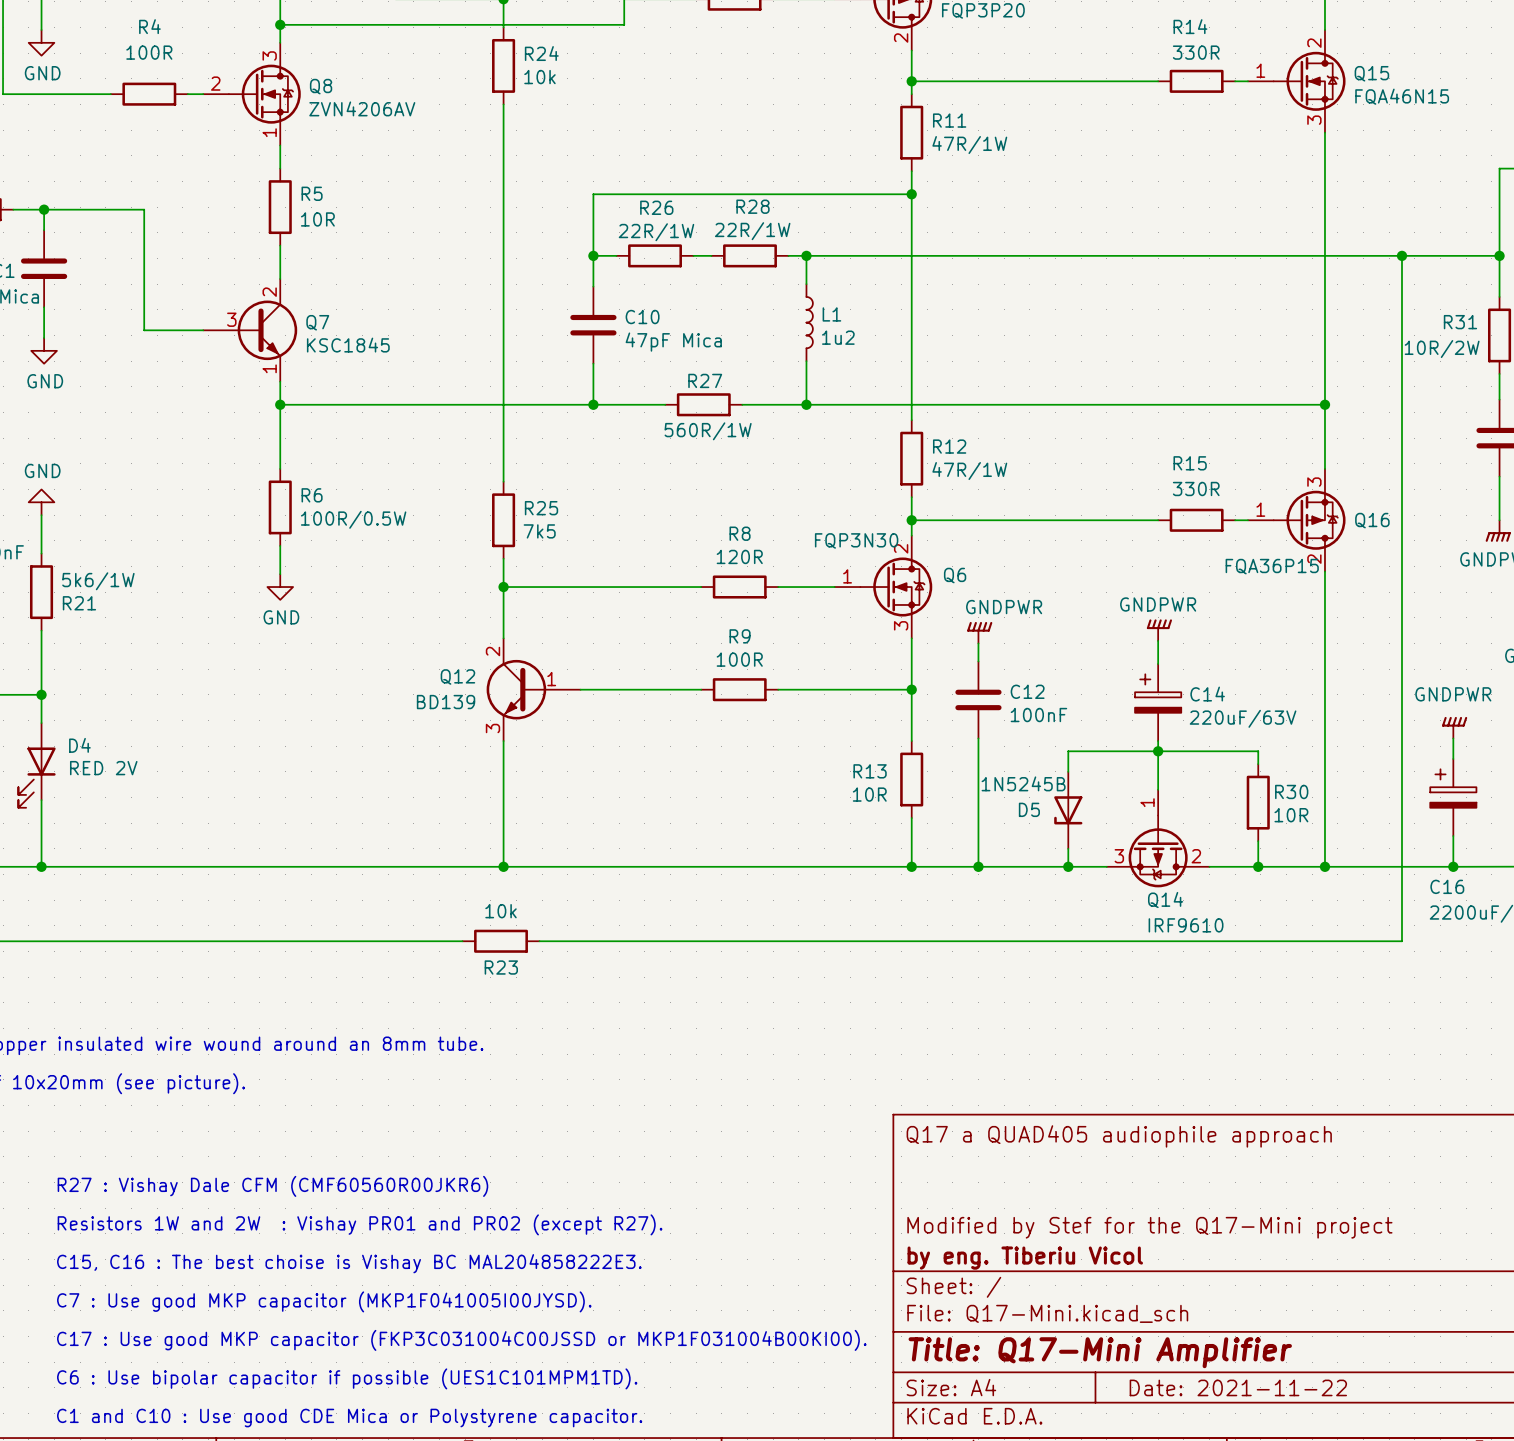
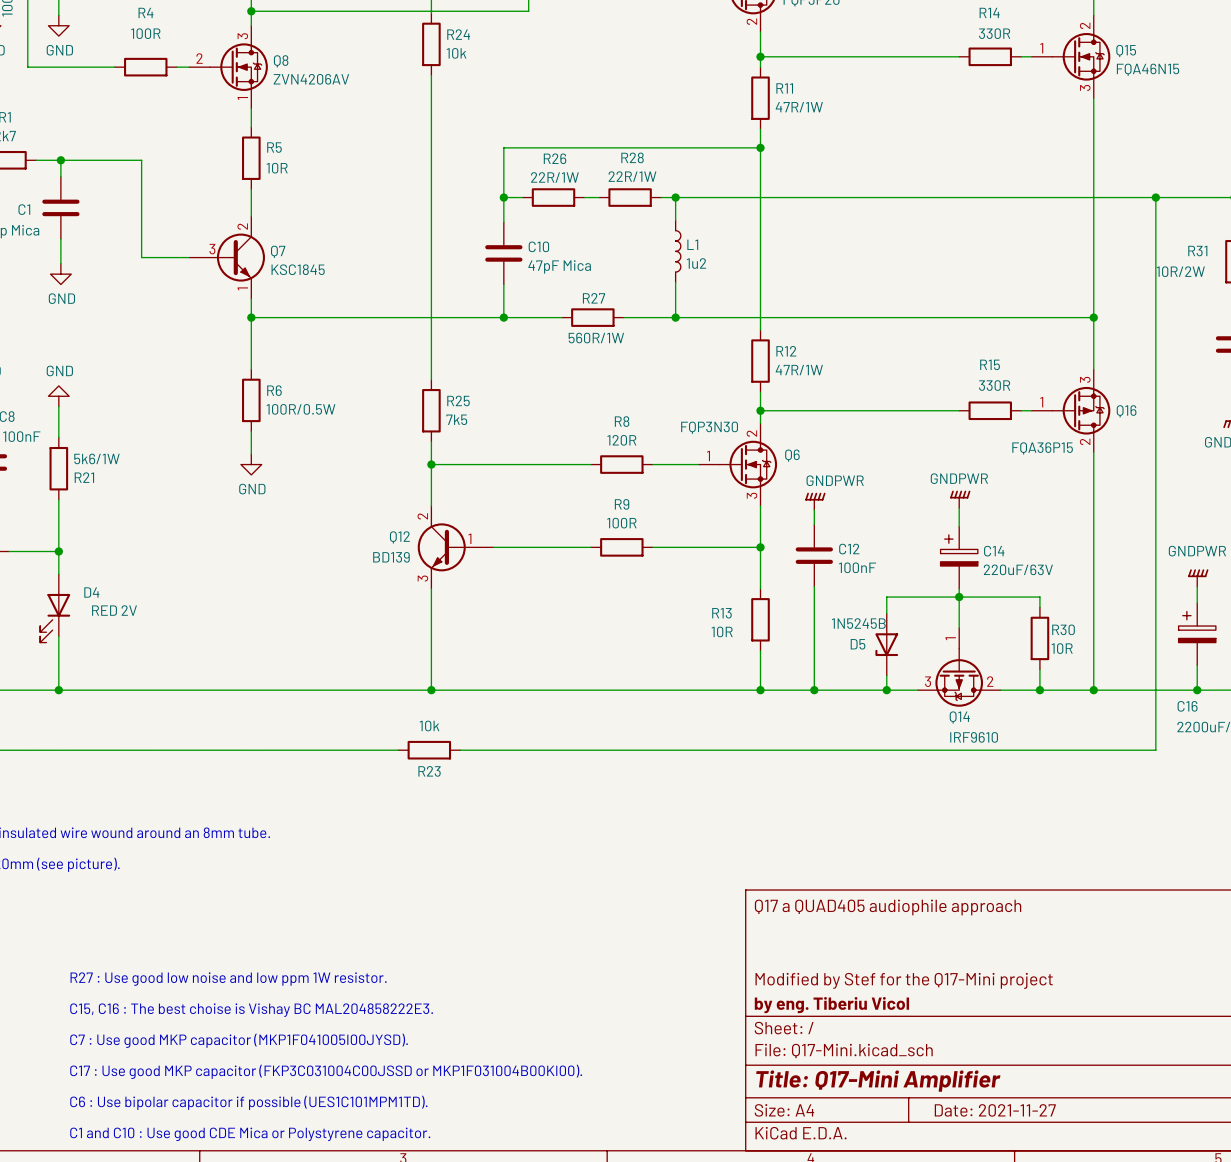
text: R27 : Vishay Dale CFM (CMF60560R00JKR6) (272, 1186) -> none
text: Resistors 1W and 2W : Vishay PR01 and PR02 (except R27). (360, 1224) -> R27 : Use good low noise and low ppm 1W resistor. (228, 979)
title block: Date: 2021-11-22 (1238, 1387) -> Date: 2021-11-27 (995, 1110)

